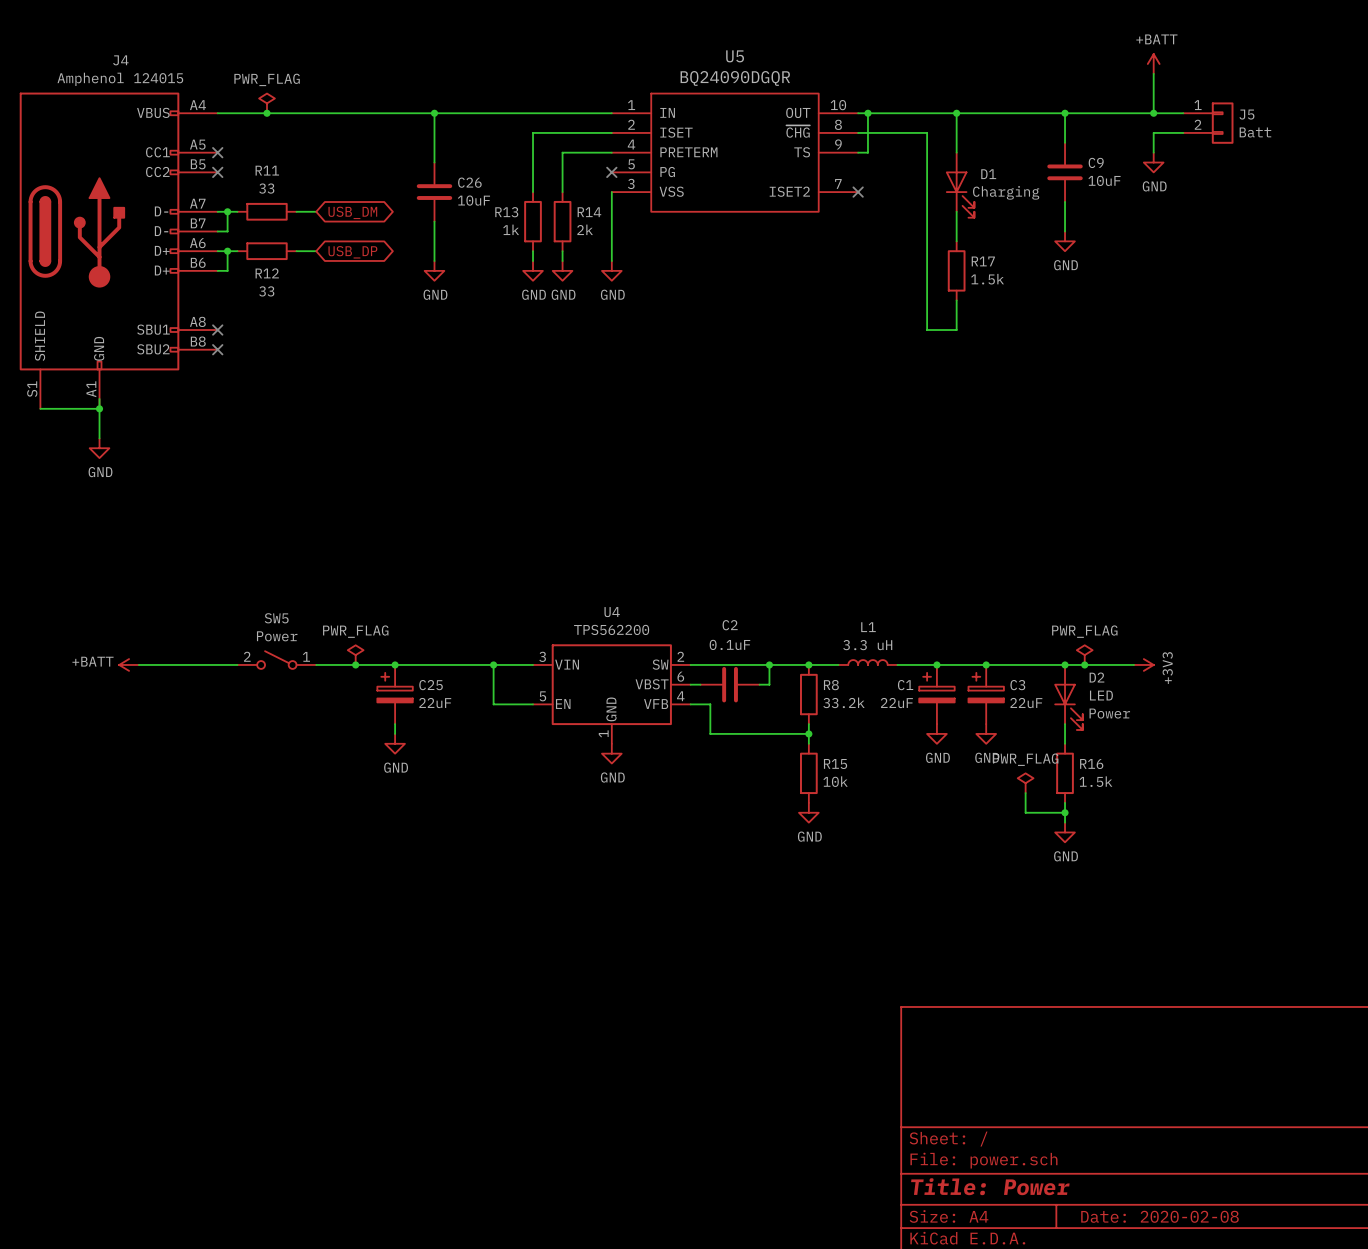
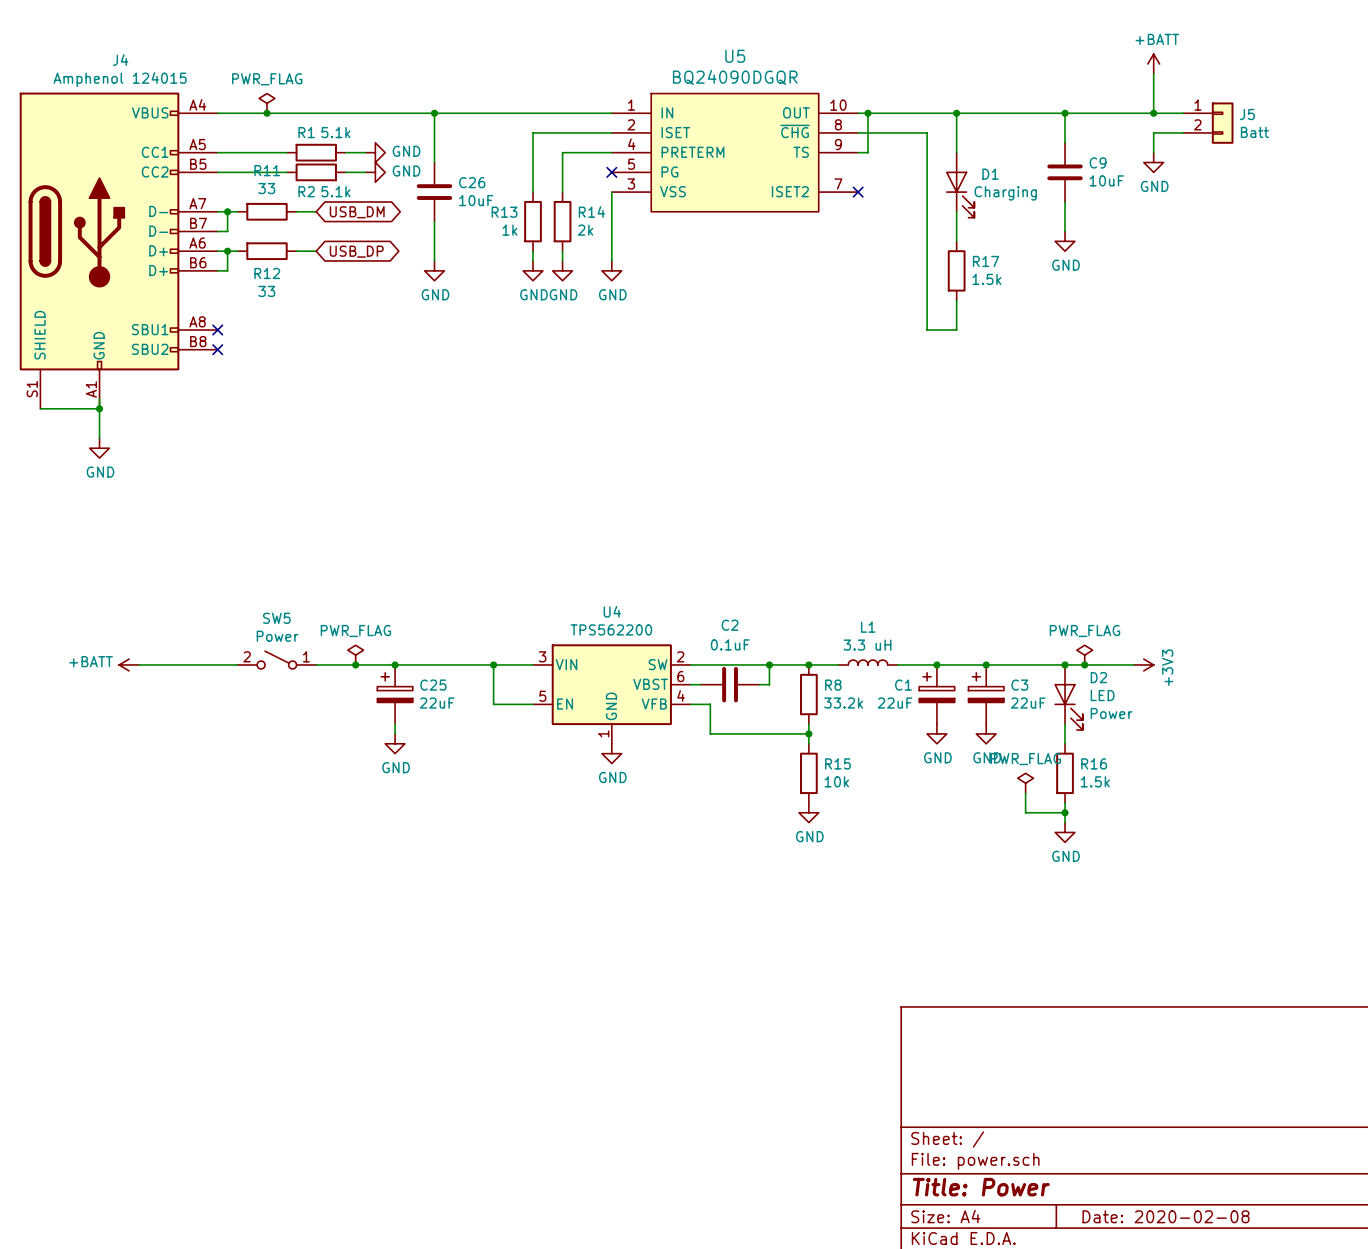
wire: none -> (217, 152) (286, 152)
no-connect mark: (217, 152) -> none
R1: none -> 5.1k (316, 152)
wire: none -> (345, 152) (365, 152)
power symbol: none -> GND (375, 152)
wire: none -> (217, 172) (286, 172)
no-connect mark: (217, 172) -> none
R2: none -> 5.1k (316, 172)
wire: none -> (345, 172) (365, 172)
power symbol: none -> GND (375, 172)

